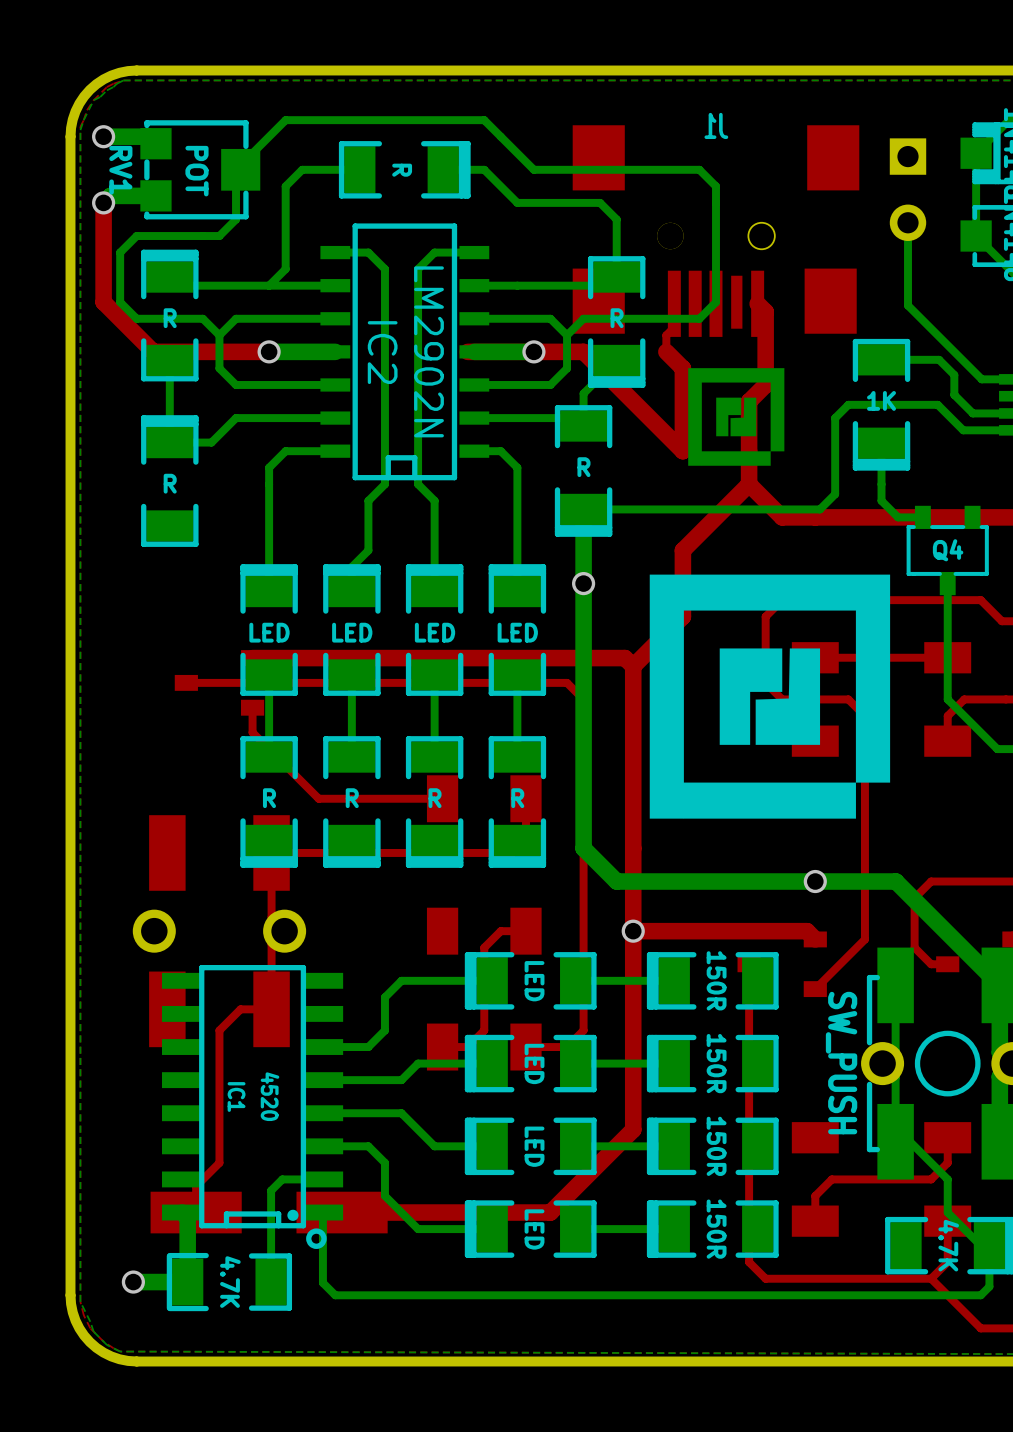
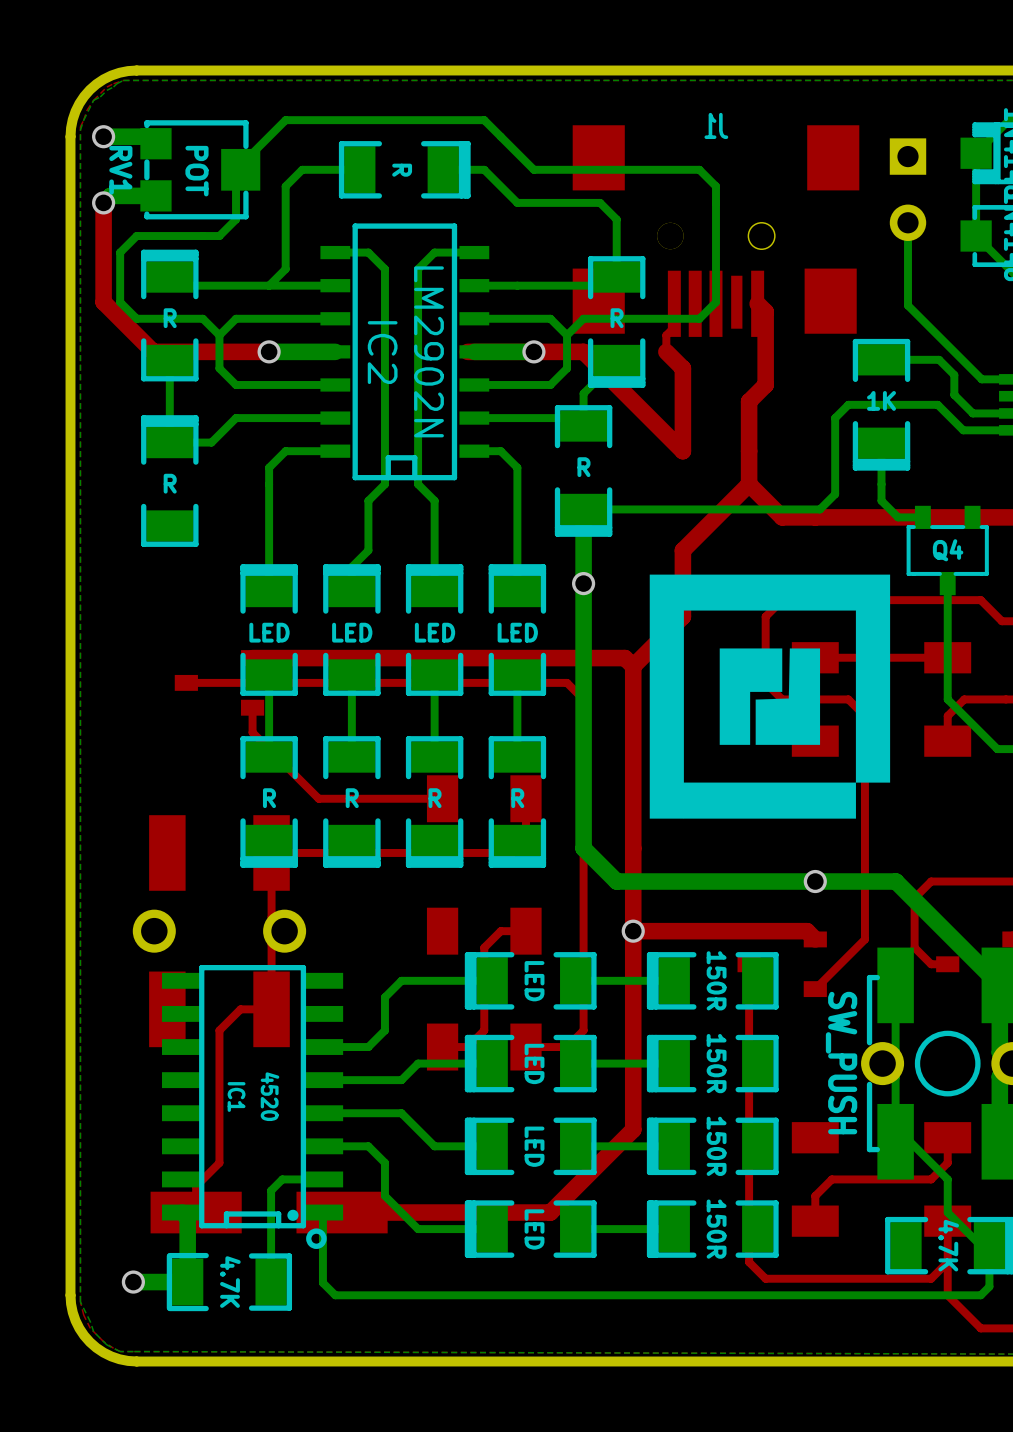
drawing: [688, 368, 785, 466] -> none
top track: (931, 1278) (947, 1295) -> (947, 1262) (947, 1295)

